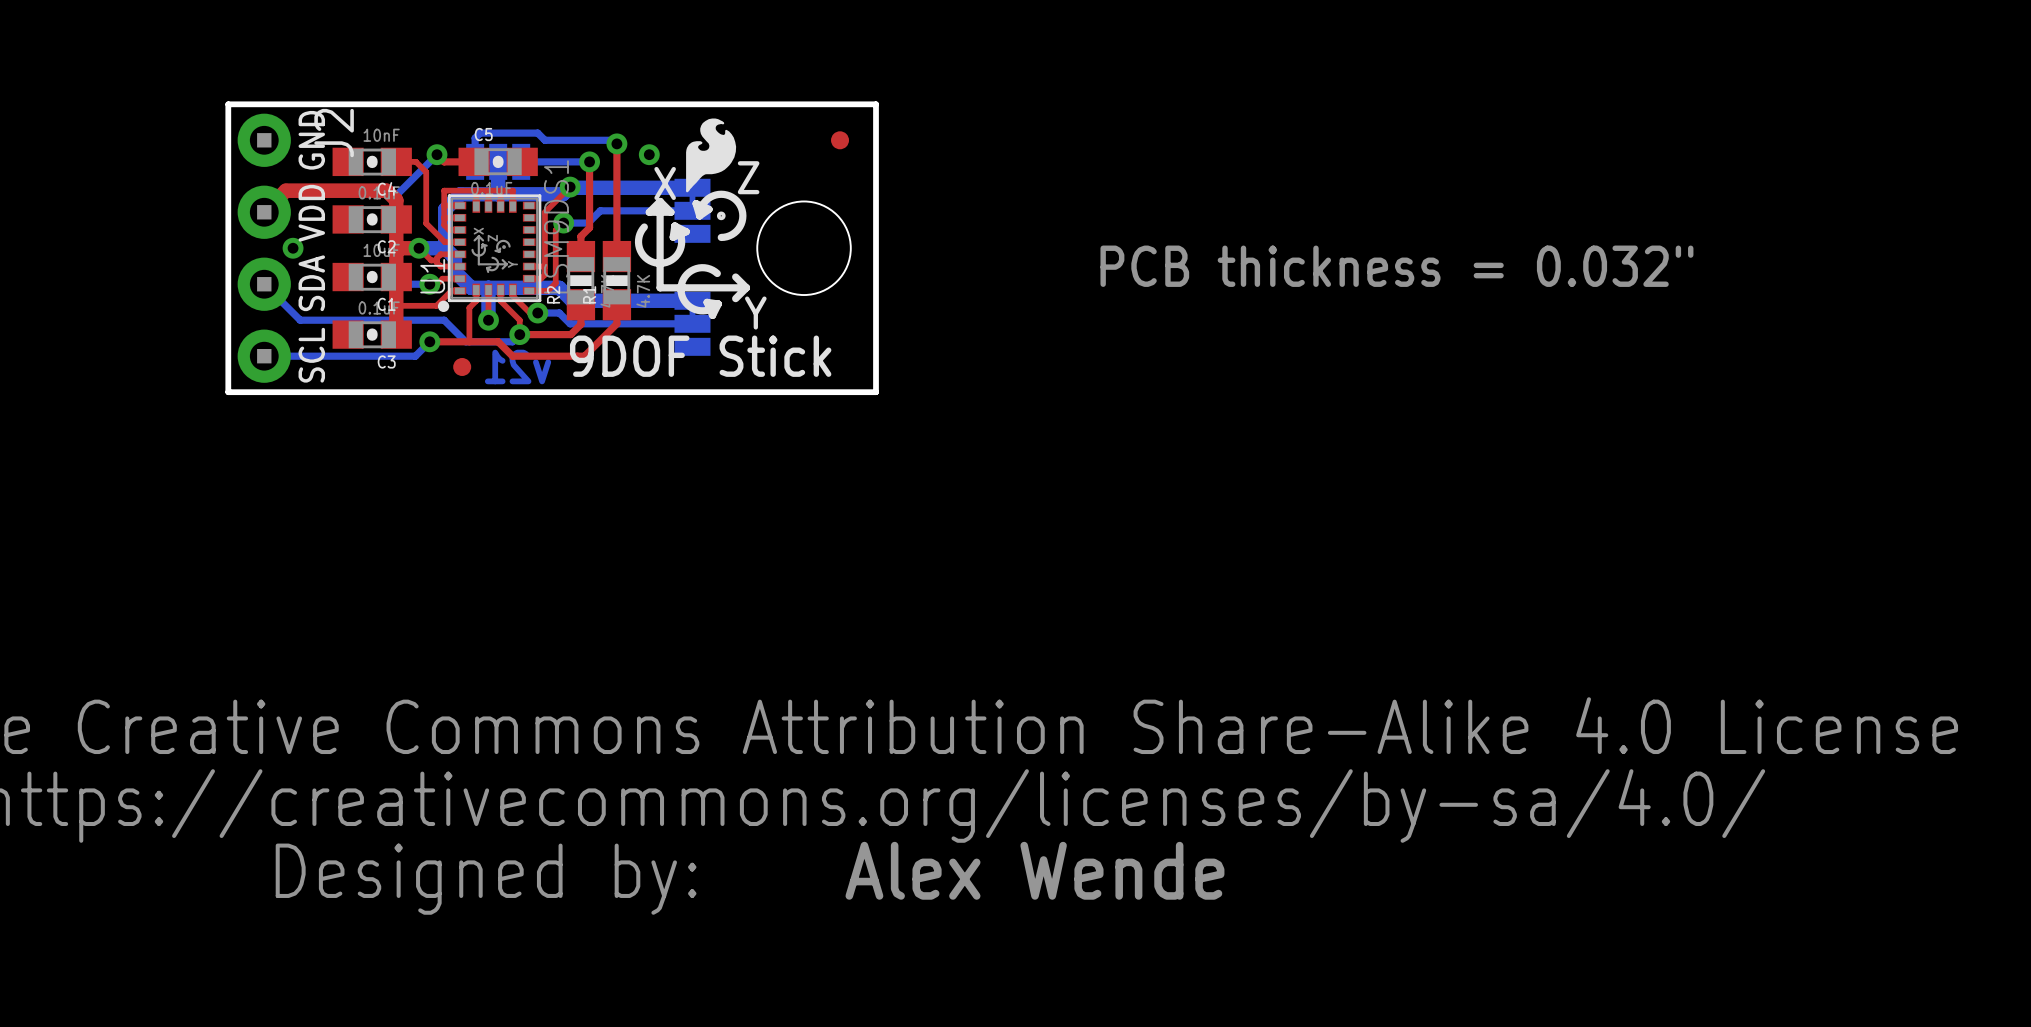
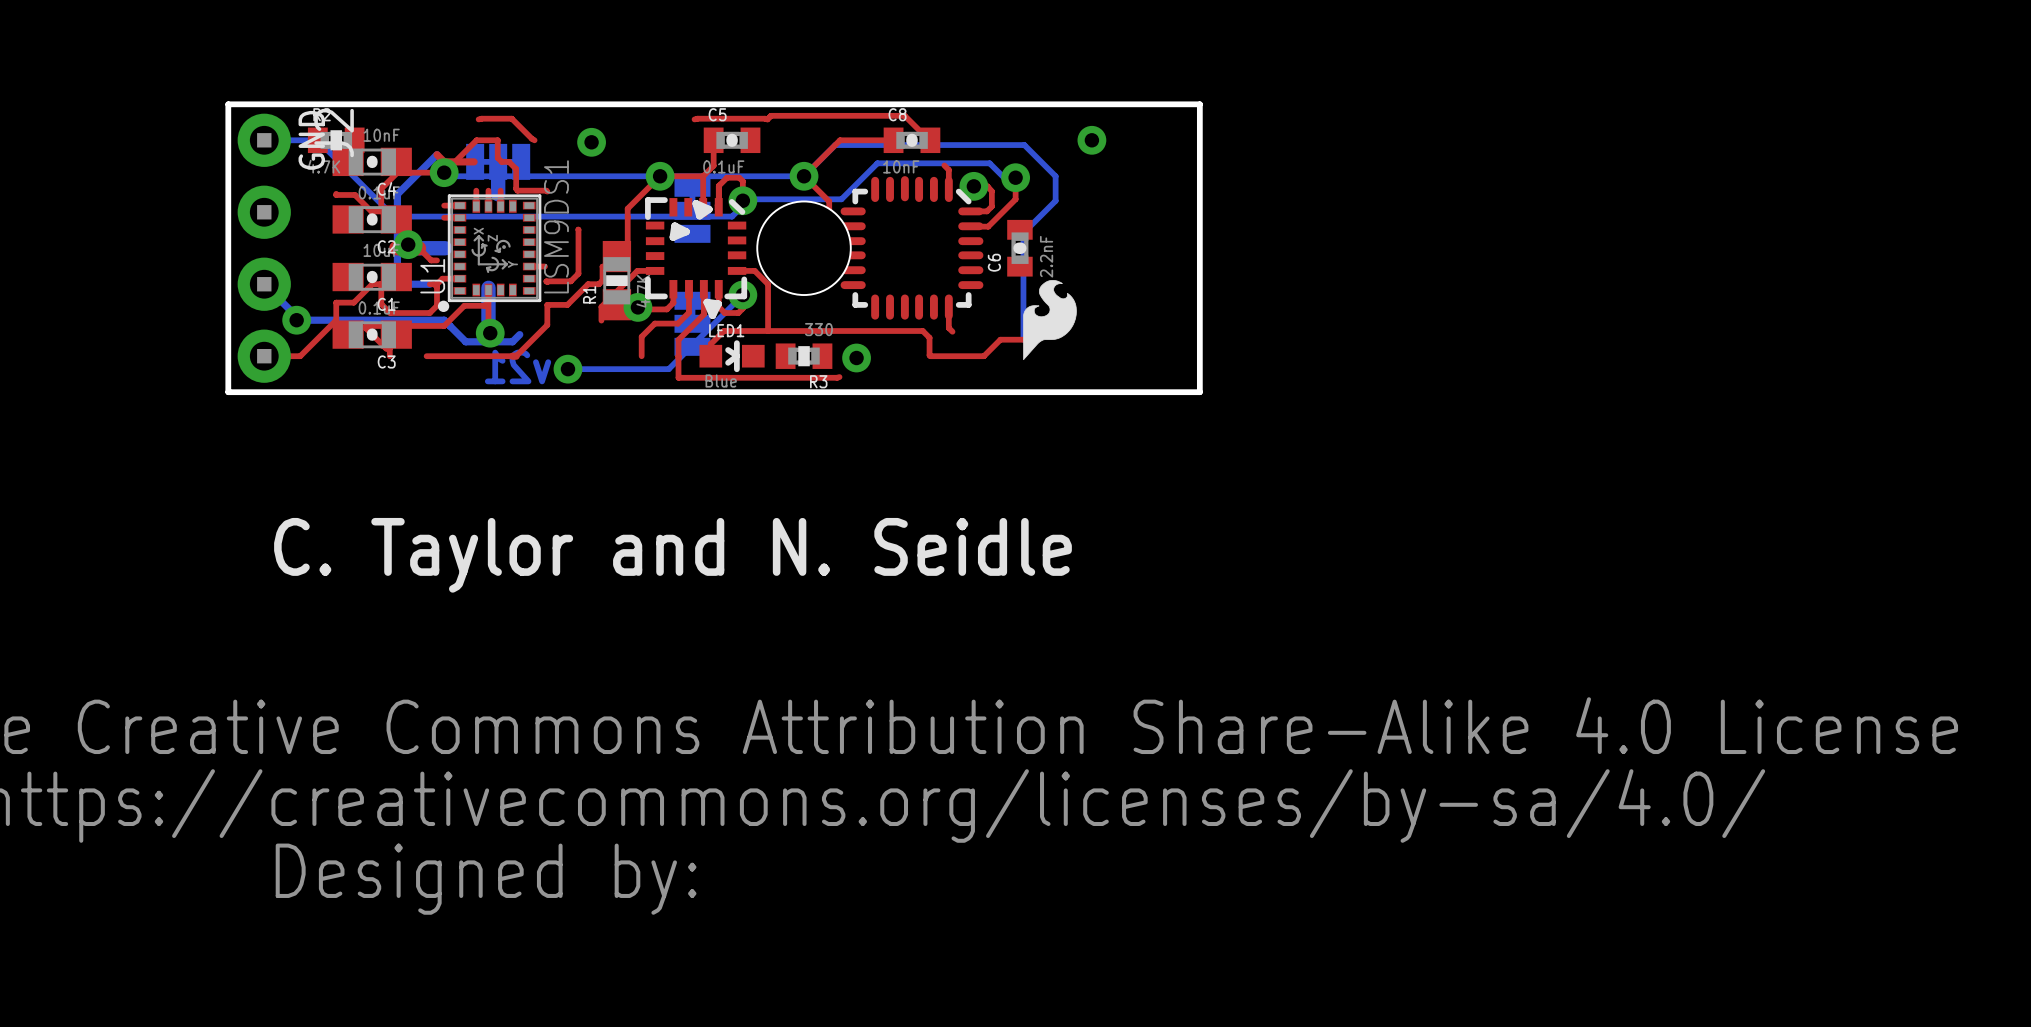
board edge: (876, 104) (876, 392) -> (876, 104) (1199, 104) (1199, 392) (876, 392)
drawing: [686, 118, 737, 221] -> none
top track: none -> (478, 119) (511, 118) (534, 140)
top track: none -> (694, 119) (767, 119) (770, 115) (904, 115) (930, 140)
bottom track: none -> (264, 140) (317, 140) (393, 216) (732, 216) (743, 205) (743, 199) (841, 199) (877, 163) (989, 163) (1004, 177) (1015, 177)
top track: none -> (713, 140) (713, 165) (703, 176)
part: (840, 140) -> none
top track: none -> (893, 140) (840, 140) (804, 176) (829, 201) (829, 215) (840, 226) (853, 226)
C8: none -> 10nF (911, 140)
via: none -> (1091, 140)
top track: (616, 143) (616, 256) -> none
bottom track: (616, 143) (616, 140) (544, 140) (537, 133) (480, 133) (475, 138) (475, 161) -> none
via: (616, 143) -> none
C5 footprint: [458, 147, 538, 177] -> [703, 127, 761, 154]
via position: (437, 154) -> (444, 172)
via position: (649, 154) -> (660, 176)
top track: (396, 161) (416, 161) (426, 172) (426, 223) (444, 242) (459, 242) -> none
bottom track: (521, 161) (589, 161) -> none
top track: (589, 161) (589, 227) (580, 236) (580, 256) -> none
via position: (589, 161) -> (591, 142)
top track: none -> (944, 165) (948, 169) (948, 189)
bottom track: none -> (444, 172) (447, 176) (804, 176) (835, 145) (1024, 145) (1055, 176) (1055, 200) (1023, 233) (1023, 339)
top track: none -> (703, 176) (703, 207)
via: none -> (804, 176)
text: Z (748, 177) -> none
top track: none -> (1015, 177) (1015, 199) (988, 226) (970, 226)
via: none -> (1015, 177)
text: X (665, 183) -> none
top track: none -> (719, 185) (719, 203) (717, 205) (717, 209) (718, 207) (718, 185) (727, 177) (739, 177) (742, 181) (742, 200)
top track: none -> (973, 186) (987, 186) (991, 191) (991, 206) (986, 211) (970, 211)
via: none -> (973, 186)
top track: (570, 187) (544, 212) (544, 274) (540, 278) (529, 278) -> none
via: (570, 187) -> none
bottom track: (692, 187) (570, 187) (562, 194) (460, 194) (445, 209) (445, 248) (454, 258) (454, 271) (471, 287) (559, 287) (572, 300) (692, 300) -> none
top track: none -> (547, 191) (517, 190) (516, 169) (508, 161) (501, 161) (497, 157) (497, 140) (476, 140) (444, 172) (397, 172) (381, 188) (381, 211) (372, 212) (354, 194) (336, 193)
via: none -> (742, 200)
line: (660, 201) (660, 287) (746, 287) -> none
line: (660, 201) (670, 212) (649, 212) (660, 201) -> none
top track: (512, 206) (512, 190) (444, 190) (444, 225) (449, 229) (459, 229) -> none
bottom track: (692, 210) (600, 210) (588, 223) (563, 223) -> none
top track: (264, 212) (285, 190) (386, 190) (396, 200) (396, 334) -> none
text: VDD (311, 213) -> none
line: (699, 215) (702, 205) (713, 195) (724, 194) (736, 200) (742, 213) (741, 224) (732, 234) (721, 237) -> none
top track: (563, 223) (555, 230) (555, 283) (548, 290) (529, 290) -> none
via: (563, 223) -> none
line: (674, 226) (681, 238) (680, 249) (673, 258) (660, 263) (647, 259) (640, 250) (638, 239) (644, 227) -> none
top track: none -> (578, 229) (578, 273) (570, 281) (547, 282)
via size: [408, 237, 430, 259] -> [393, 230, 423, 260]
R2 footprint: [566, 240, 596, 321] -> [307, 127, 365, 154]
part: none -> (911, 247)
via: (293, 248) -> none
part: none -> (696, 248)
C6: none -> 2.2nF (1019, 248)
top track: (459, 254) (440, 254) (437, 258) (437, 262) (440, 266) (459, 266) -> none
text: PCB thickness = 0.032" (1396, 266) -> none
top track: none -> (655, 270) (637, 270) (601, 306) (601, 320)
top track: none -> (737, 270) (754, 270) (768, 284) (768, 331)
line: (717, 273) (704, 267) (693, 269) (685, 276) (680, 289) (685, 302) (694, 309) (706, 310) (718, 304) -> none
line: (735, 277) (746, 287) -> none
drawing: none -> [1023, 279, 1077, 361]
text: SDA (311, 283) -> none
via: (429, 284) -> none
top track: none -> (435, 285) (437, 286) (437, 305) (429, 313) (390, 313) (381, 304) (381, 285) (372, 284) (353, 302) (336, 302) (336, 320) (300, 356) (264, 356)
line: (746, 287) (735, 298) -> none
top track: none -> (673, 289) (673, 302) (666, 309) (639, 309) (637, 307)
top track: none -> (689, 289) (689, 312) (678, 323) (654, 323) (641, 336) (641, 356)
top track: none -> (703, 289) (703, 314) (678, 339) (678, 377) (839, 377)
top track: none -> (718, 289) (718, 306) (724, 313) (738, 313) (742, 308) (742, 295)
top track: (459, 290) (451, 290) (436, 305) (396, 305) -> none
top track: (476, 290) (476, 300) (469, 307) (469, 341) -> none
top track: (500, 290) (500, 301) (519, 320) (519, 334) (570, 334) (580, 324) (580, 304) -> none
top track: (512, 295) (529, 313) (537, 313) -> none
bottom track: none -> (742, 295) (668, 369) (567, 369)
via: none -> (742, 295)
top track: none -> (484, 304) (464, 305) (444, 325) (366, 325) (365, 327) (386, 348) (389, 348) (389, 356)
top track: (616, 304) (616, 323) (584, 356) (516, 356) -> (703, 176) (660, 176) (627, 208) (627, 255) (616, 266) (602, 266) (602, 280) (598, 284) (588, 284) (567, 304) (547, 304) (547, 325) (516, 356)
via: none -> (637, 307)
top track: none -> (948, 307) (948, 328) (952, 331)
via size: [478, 309, 499, 331] -> [475, 318, 505, 348]
bottom track: (537, 313) (559, 313) (570, 323) (692, 323) -> none
via: (537, 313) -> none
text: Y (755, 313) -> none
via: none -> (296, 320)
via: (519, 334) -> none
top track: none -> (1023, 339) (1000, 339) (983, 356) (930, 356) (929, 337) (922, 331) (723, 331) (710, 344) (710, 356)
top track: (429, 341) (498, 341) (512, 356) -> (426, 356) (512, 356)
bottom track: (429, 341) (415, 356) (264, 356) -> none
via: (429, 341) -> none
text: SCL (311, 355) -> none
text: 9DOF Stick (700, 356) -> none
LED1: none -> Blue (732, 356)
R3: none -> 330 (804, 356)
via: none -> (856, 357)
part: (462, 366) -> none
via: none -> (567, 369)
text: none -> C. Taylor and N. Seidle (672, 555)
text: Alex Wende (1034, 870) -> none

